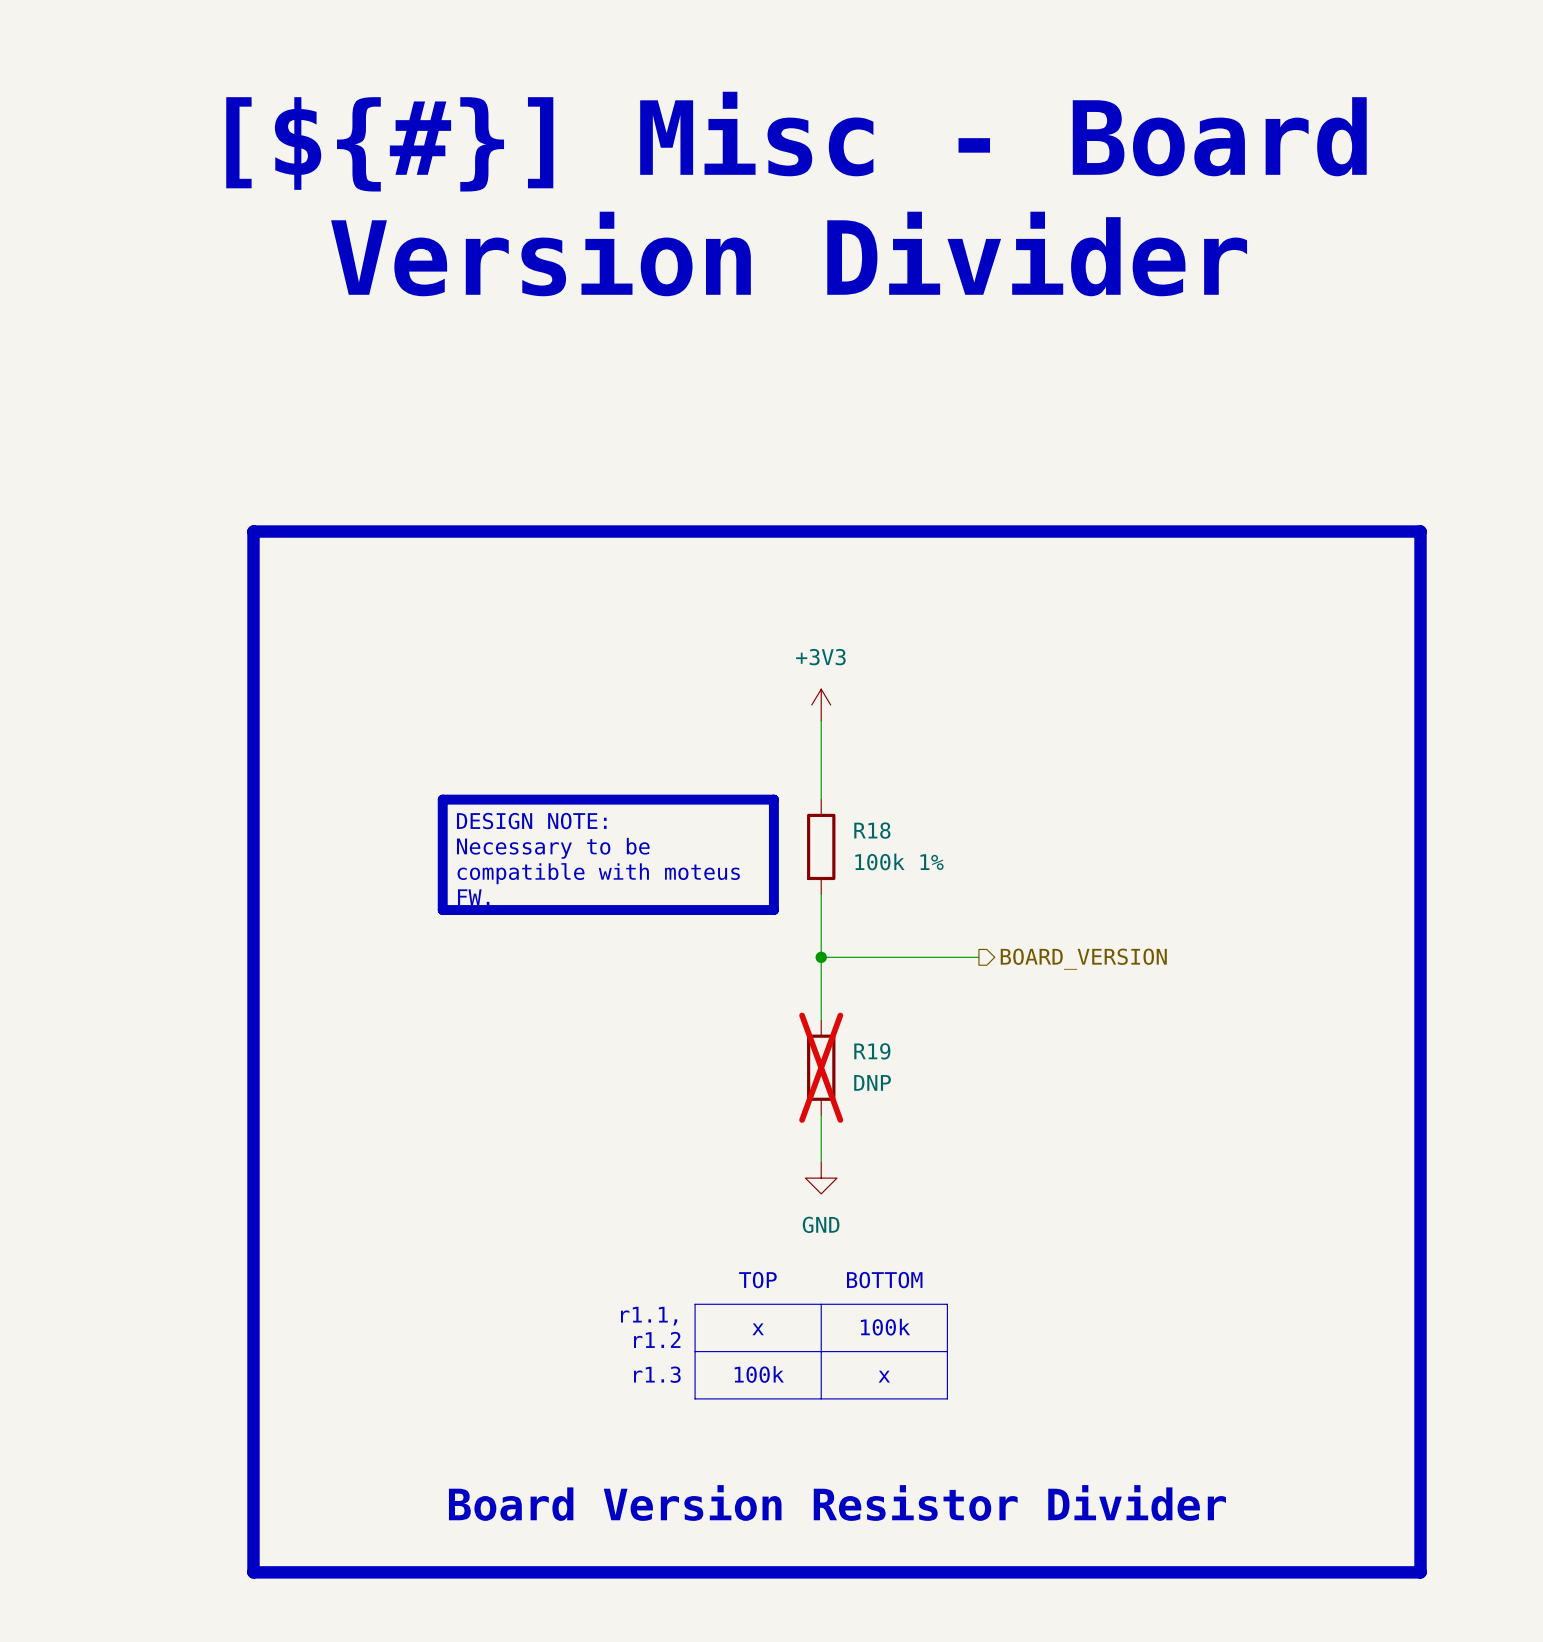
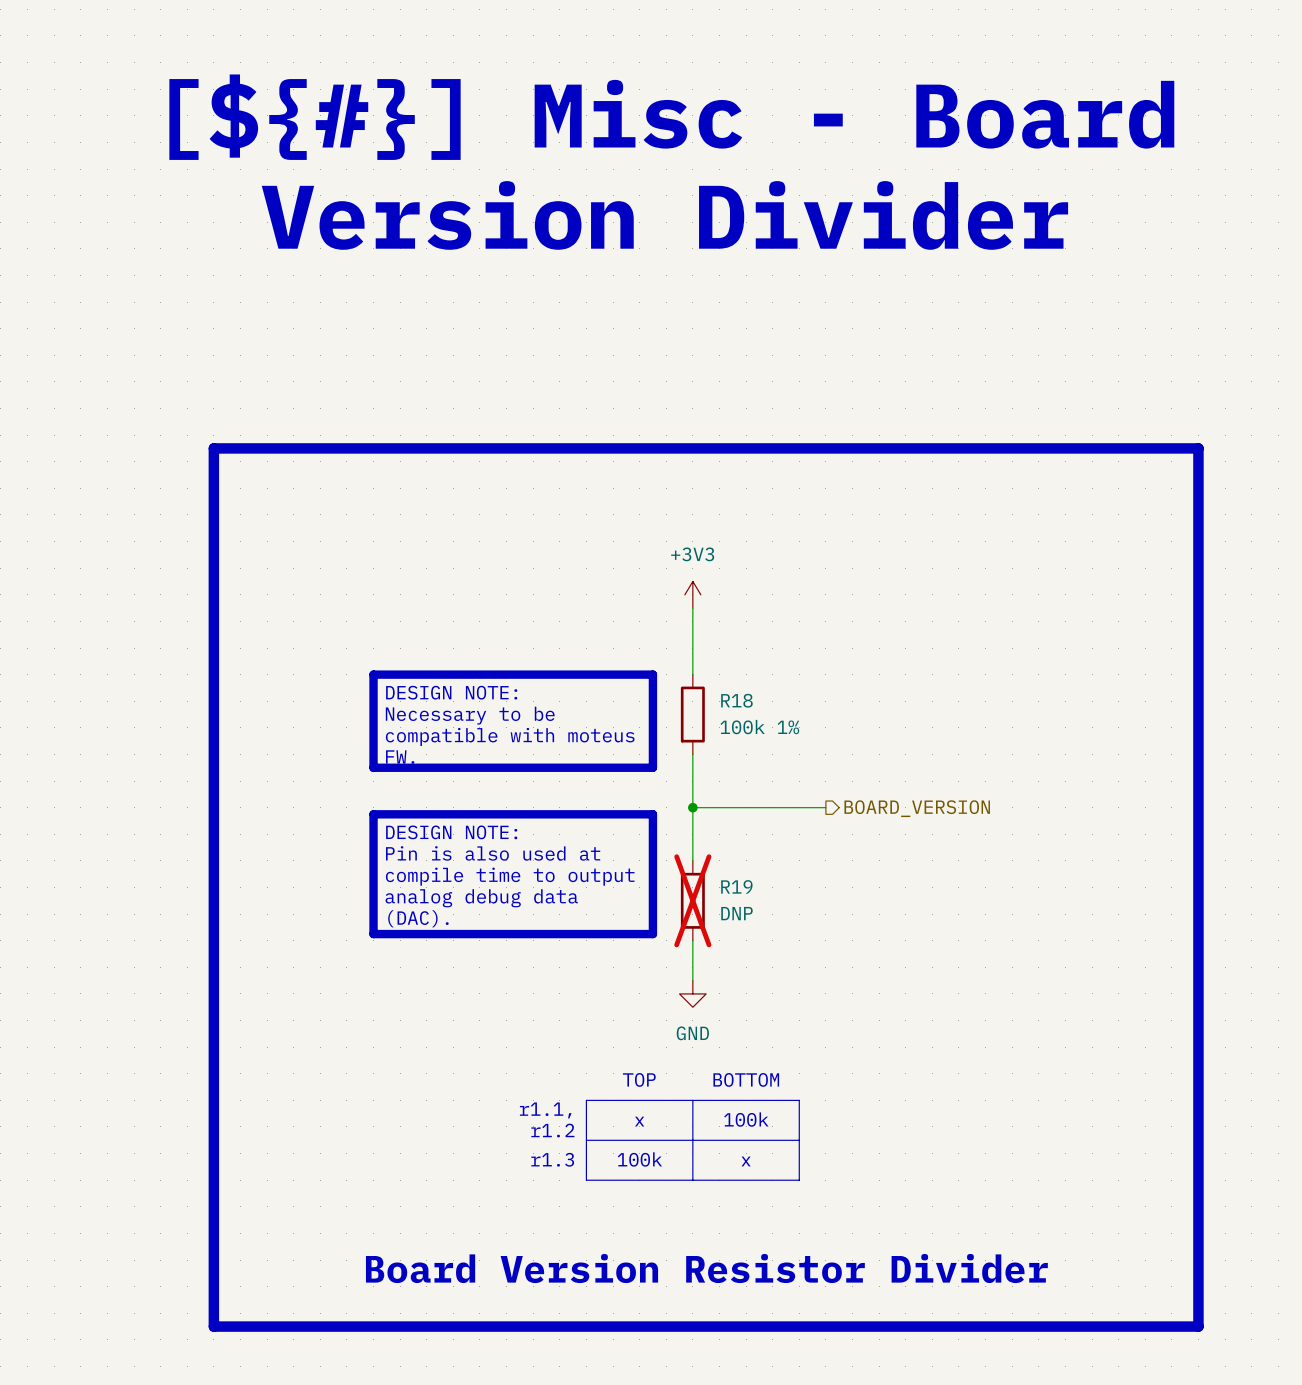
line: none -> (373, 814) (652, 814) (652, 934) (373, 934) (373, 814)
text: none -> DESIGN NOTE: (451, 832)
text: none -> Pin is also used at (493, 853)
text: none -> compile time to output (510, 876)
text: none -> analog debug data (481, 898)
text: none -> (DAC). (418, 918)

